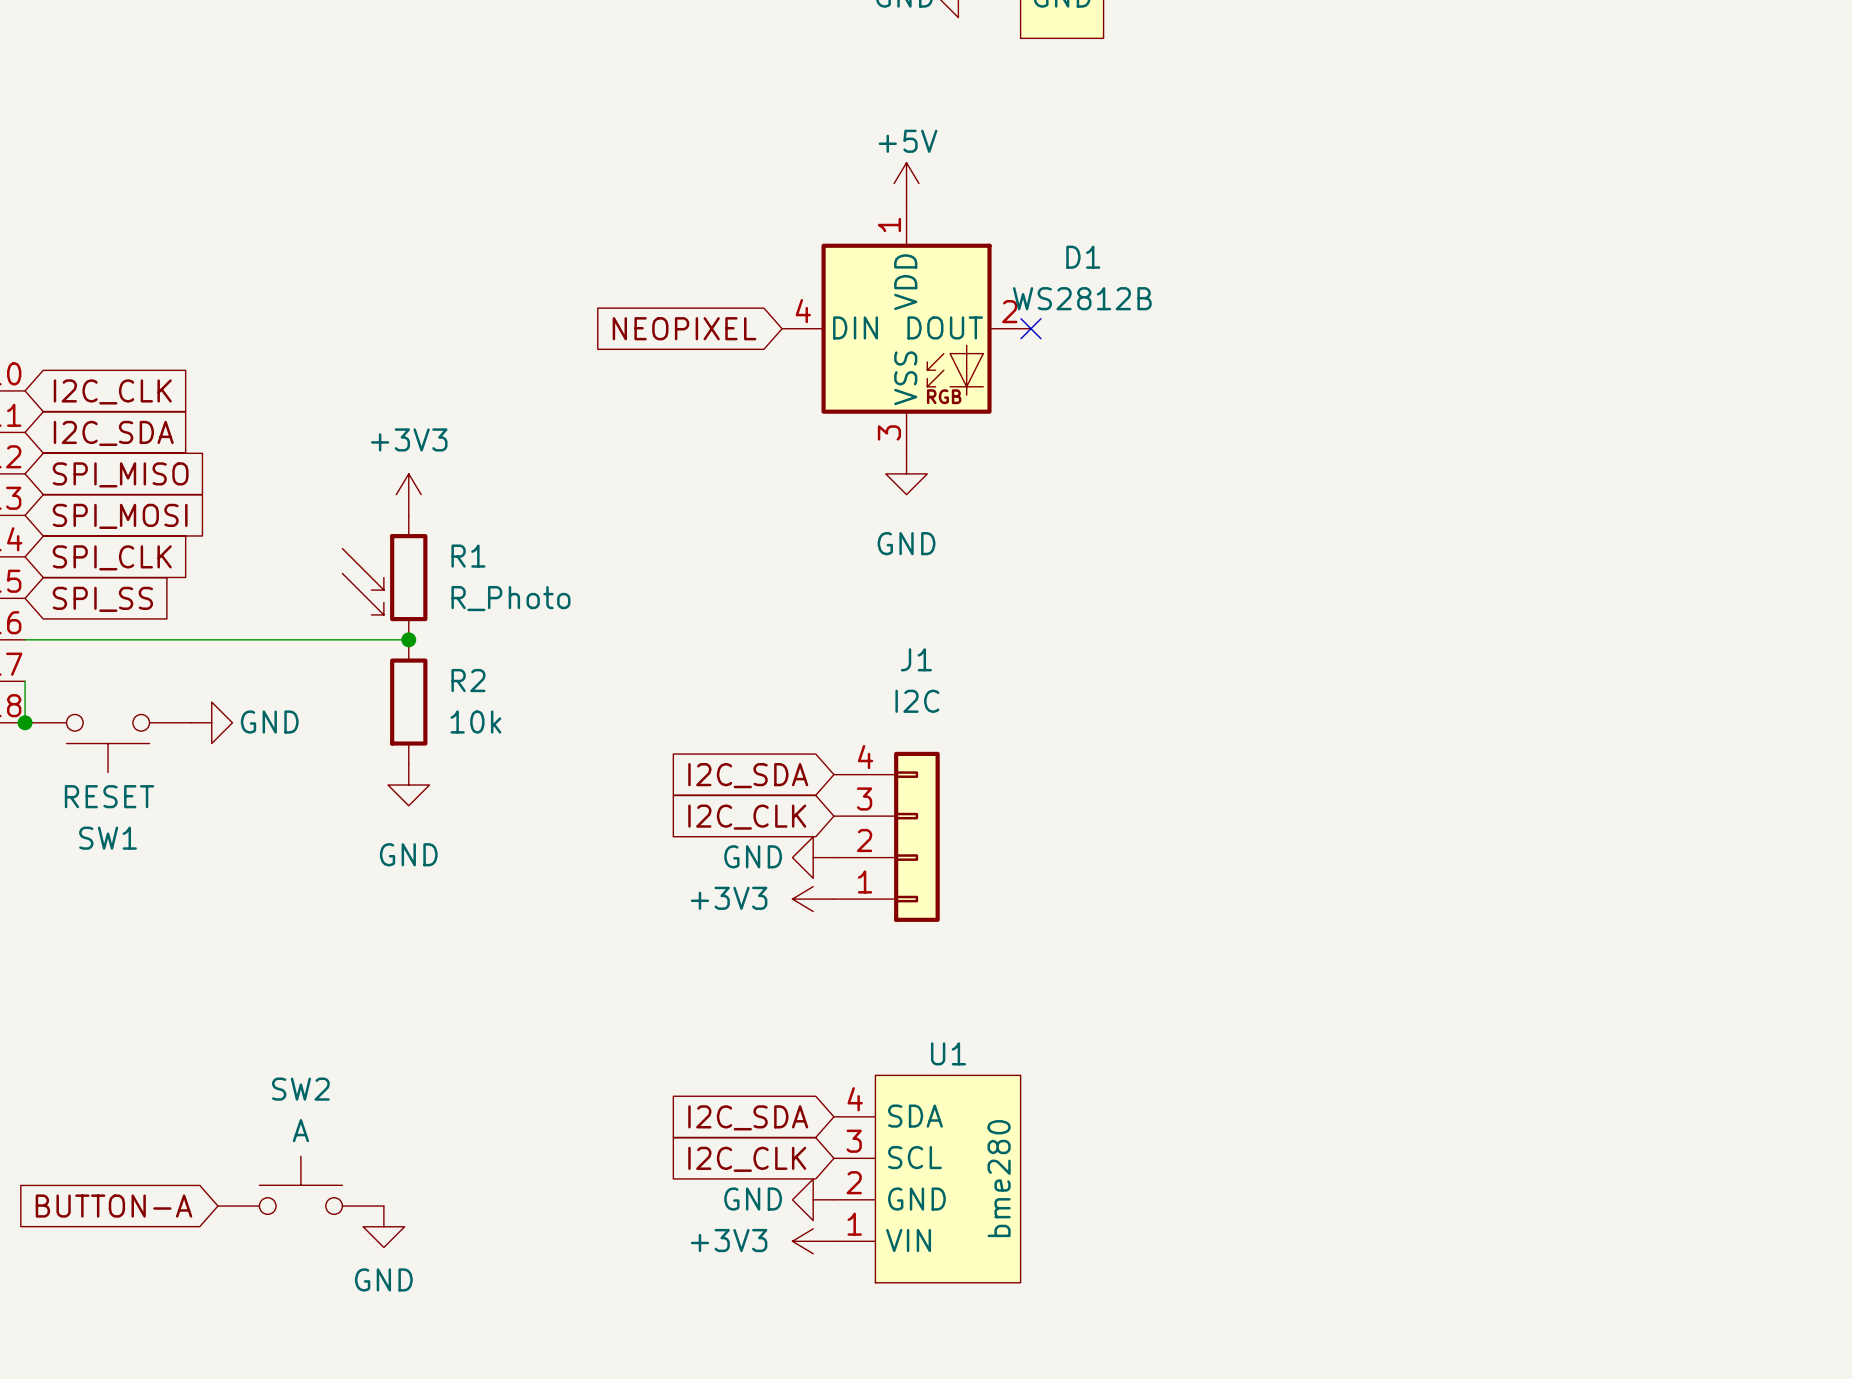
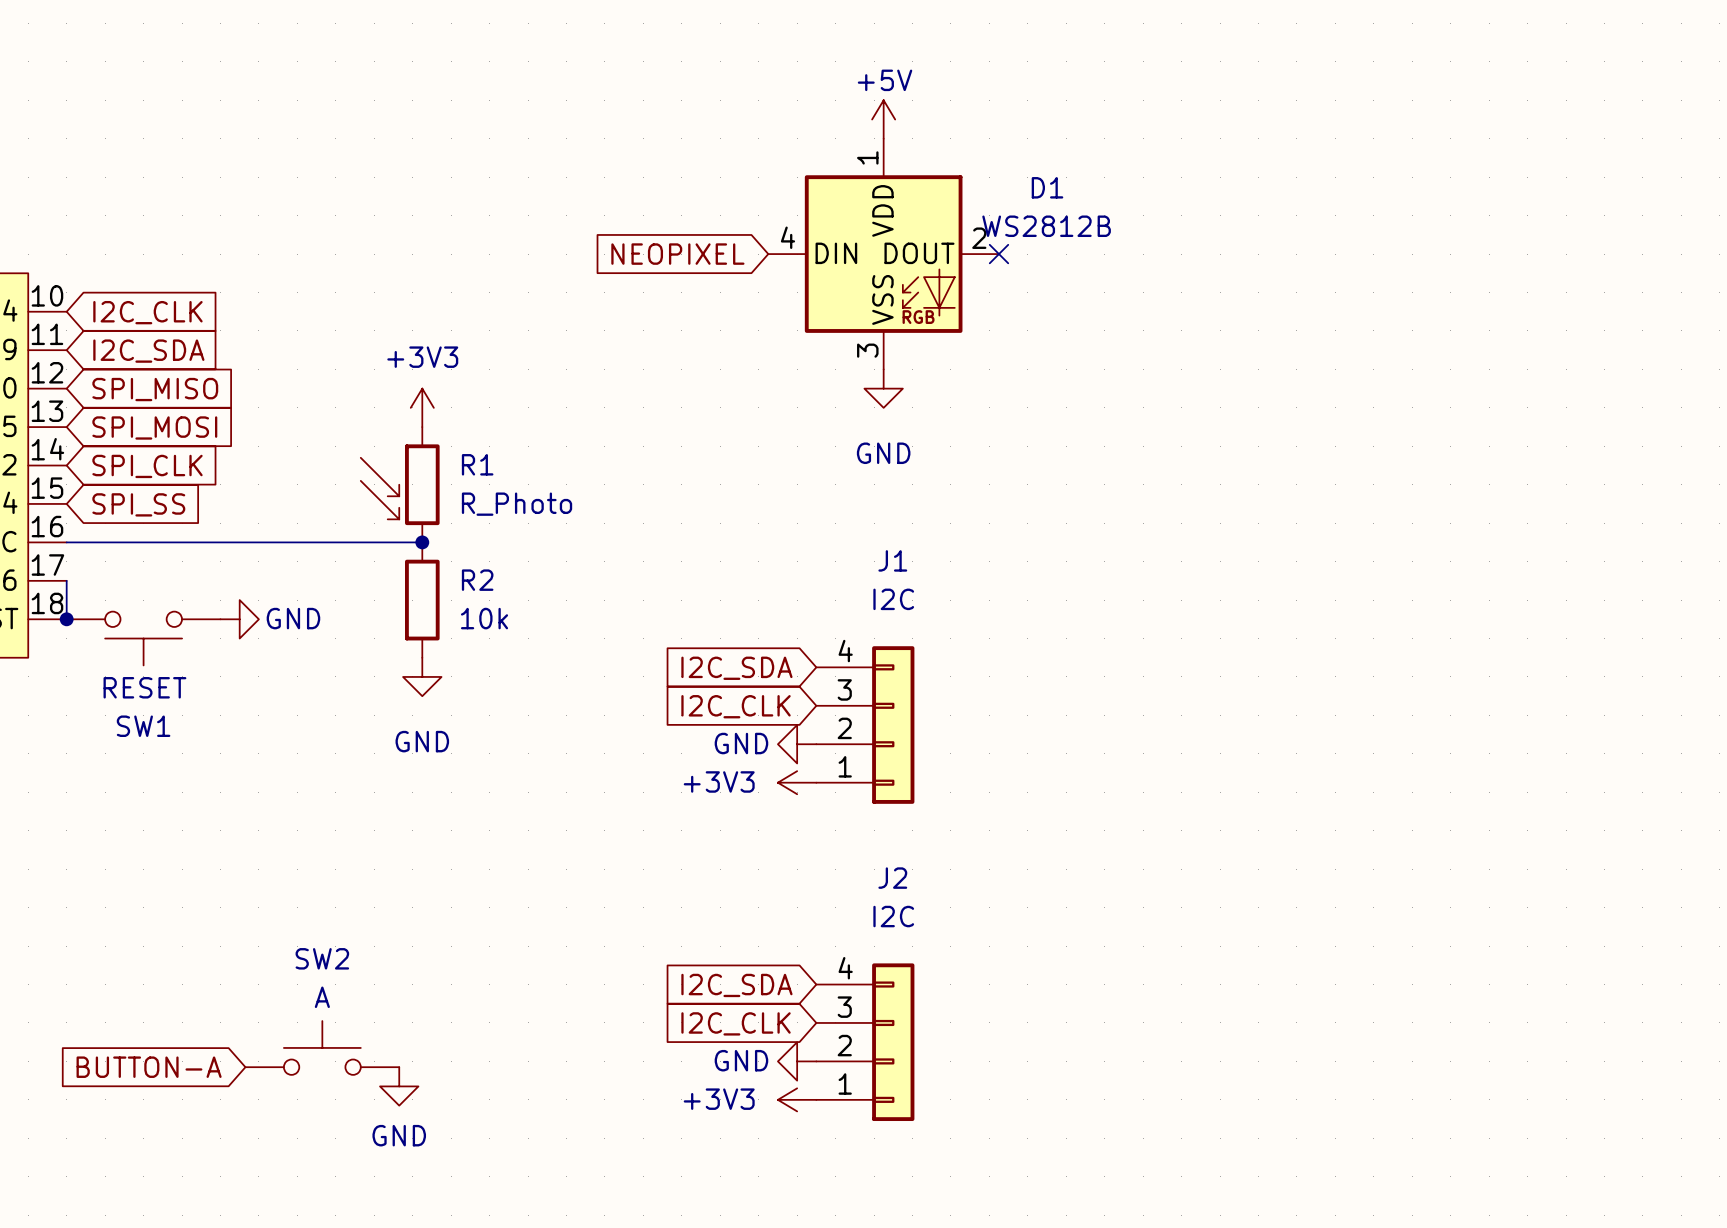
J2: none -> I2C (865, 1042)
U1: bme280 (927, 1179) -> none

